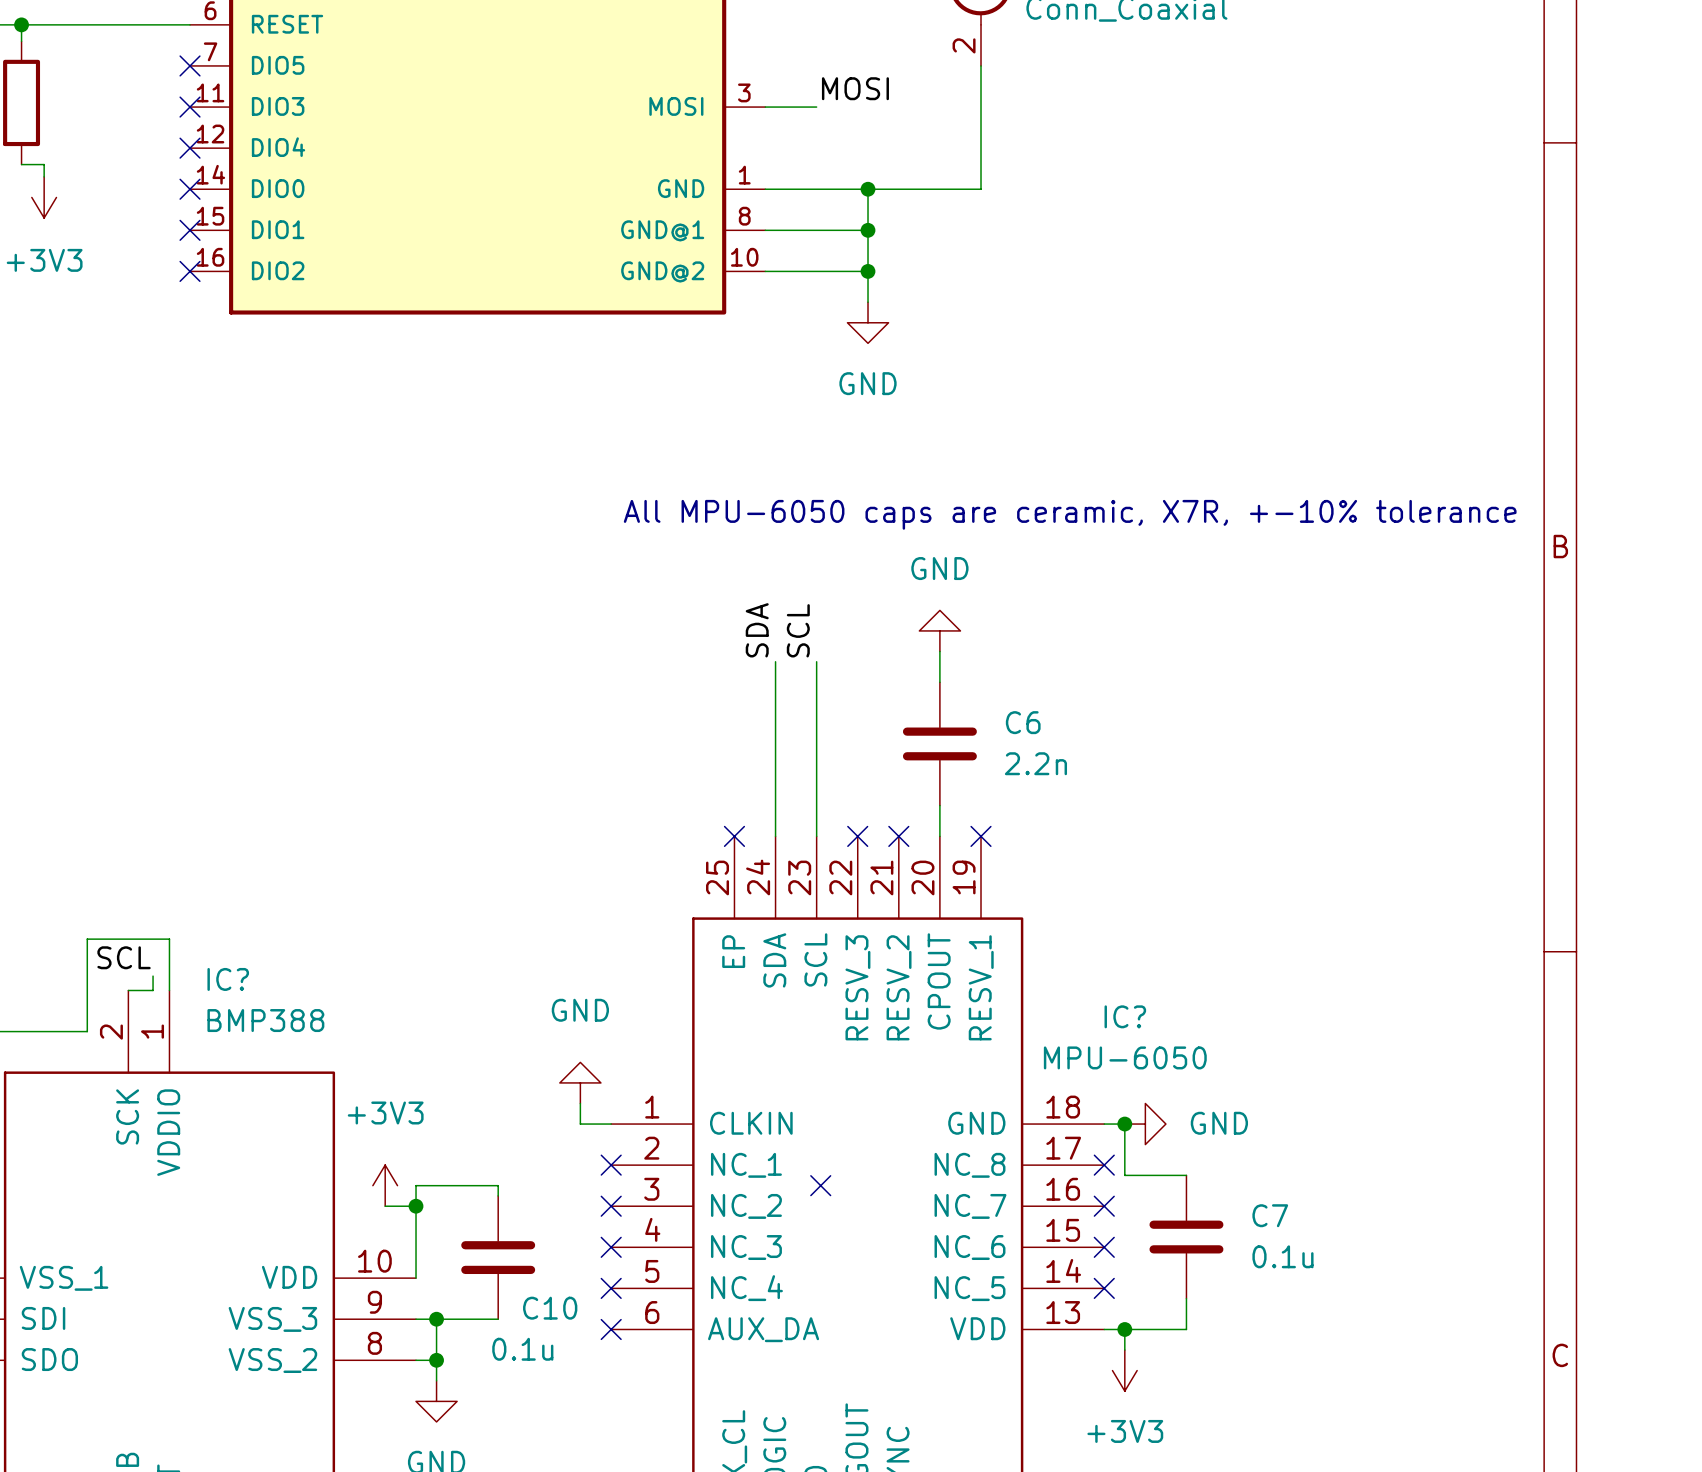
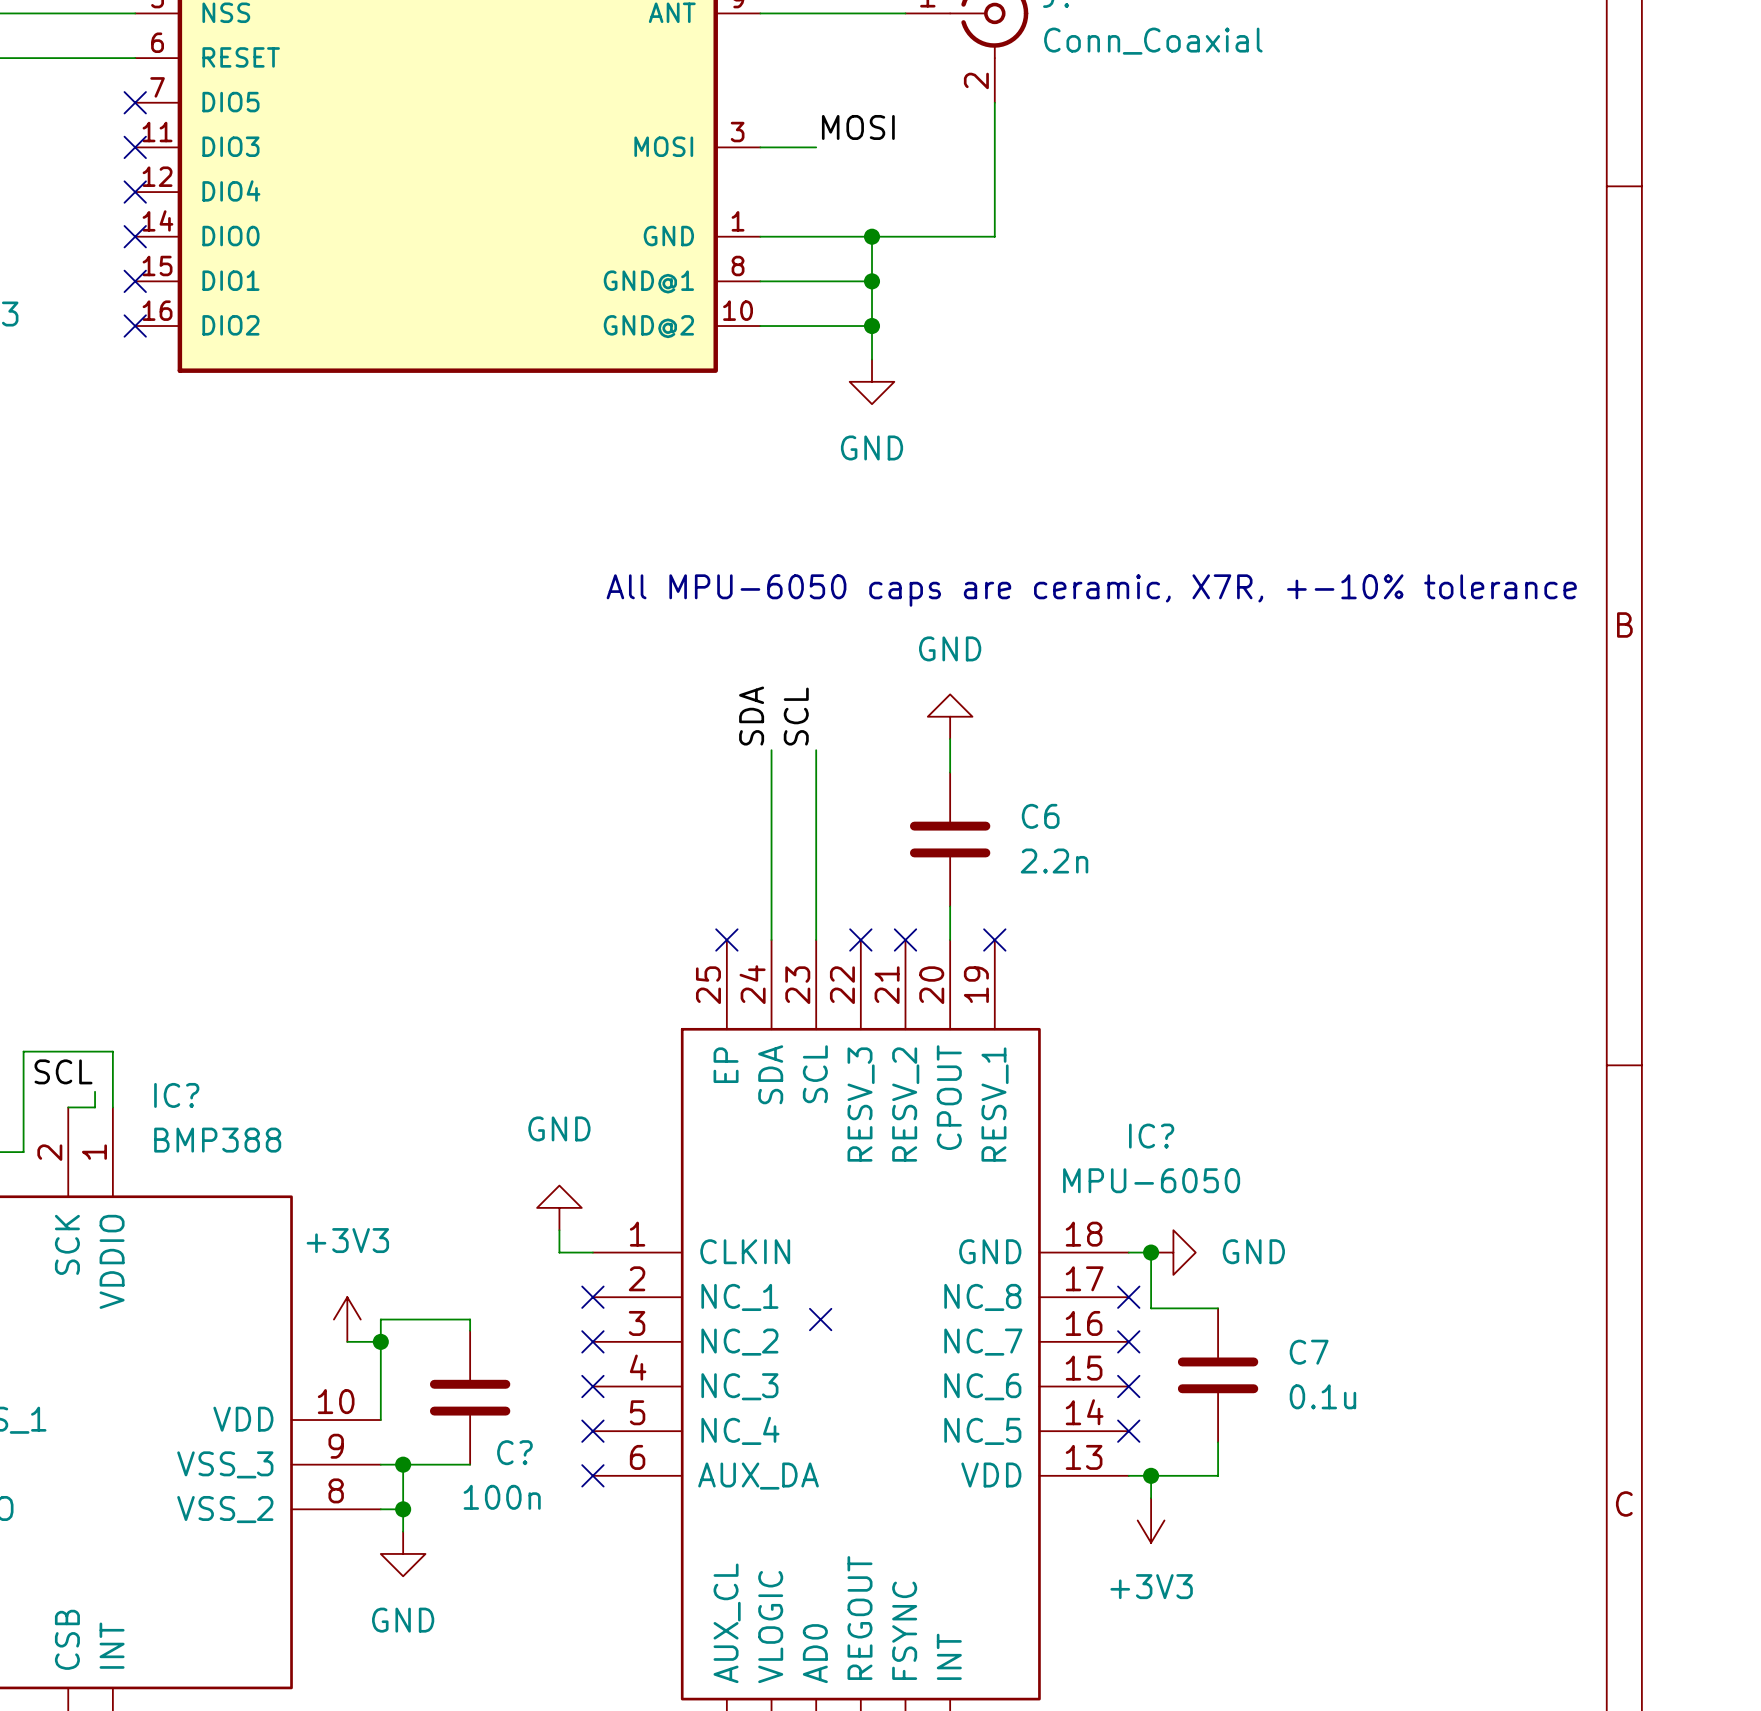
C10 name: C10 (550, 1308) -> C? (514, 1452)
C10 value: 0.1u (522, 1349) -> 100n (502, 1497)

